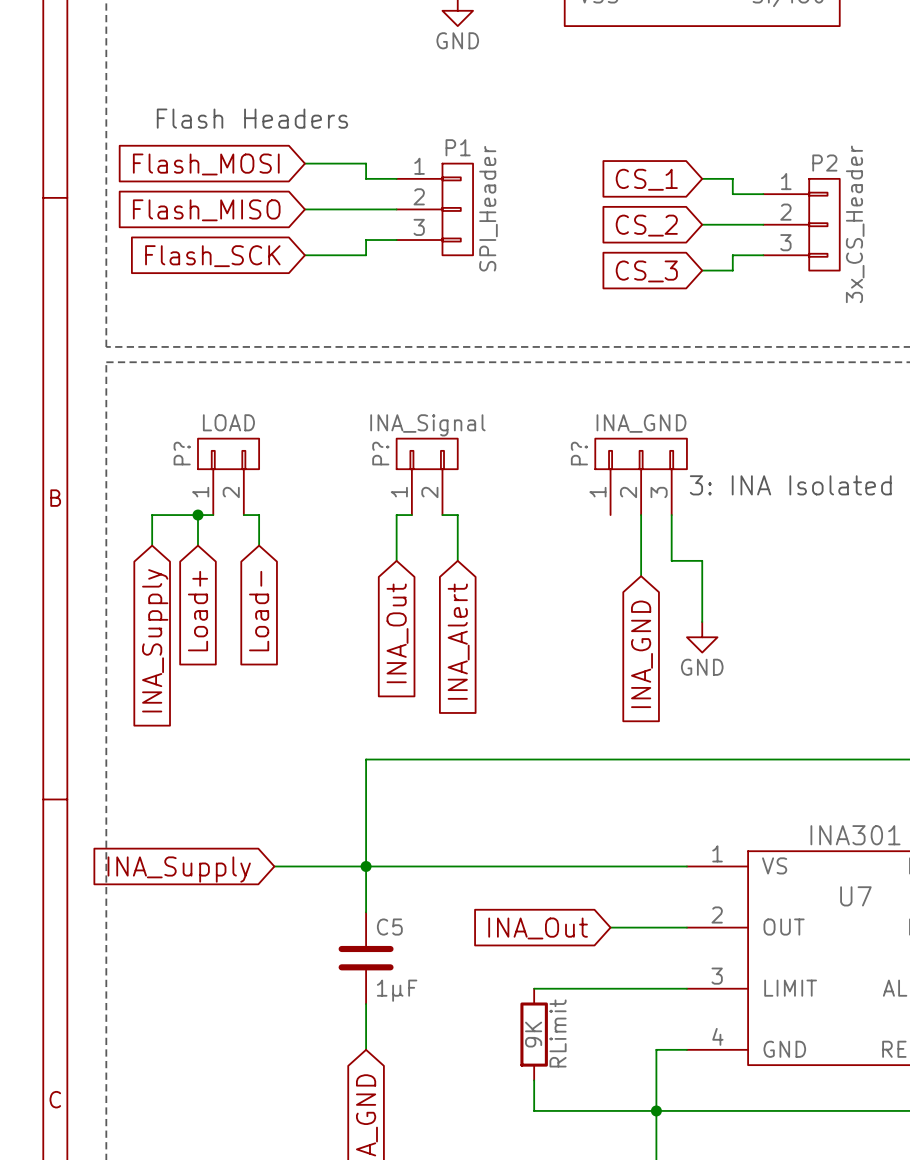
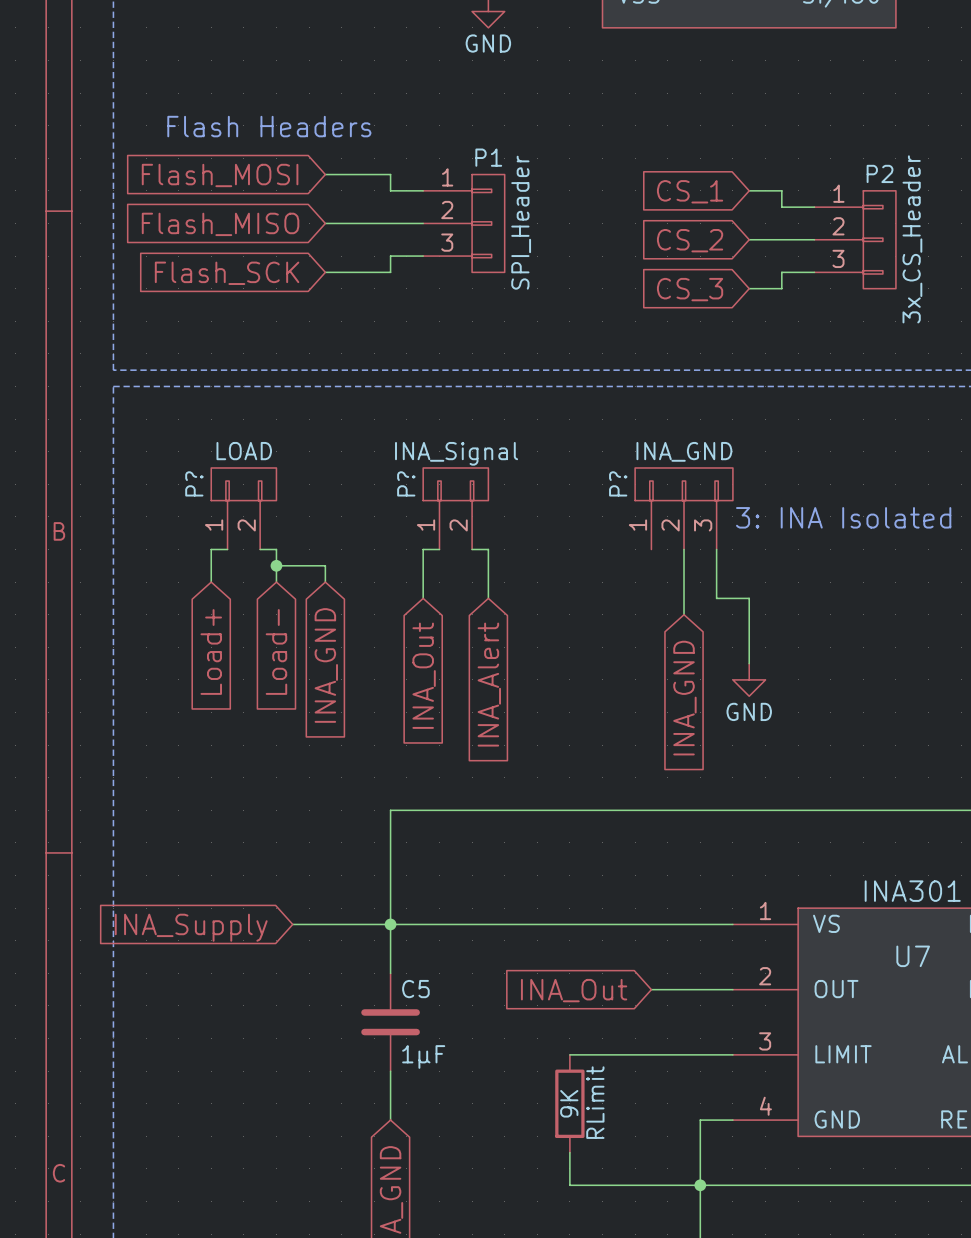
wire: (197, 515) (152, 515) (152, 545) -> none
junction position: (197, 515) -> (276, 565)
wire: none -> (276, 565) (325, 565) (325, 582)
global label: none -> INA_GND (326, 665)
global label: INA_Supply (155, 640) -> none

